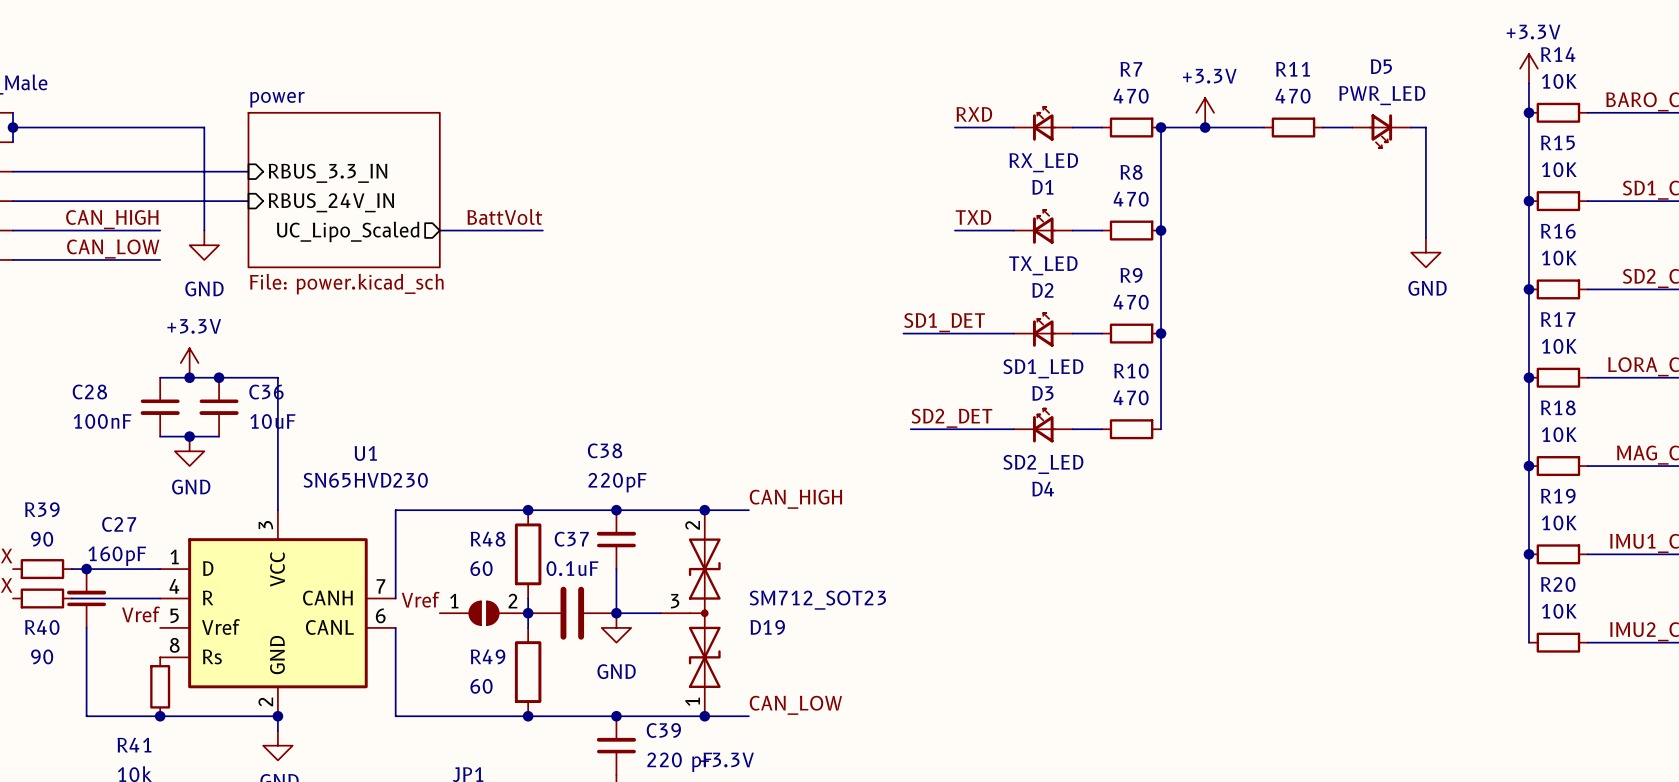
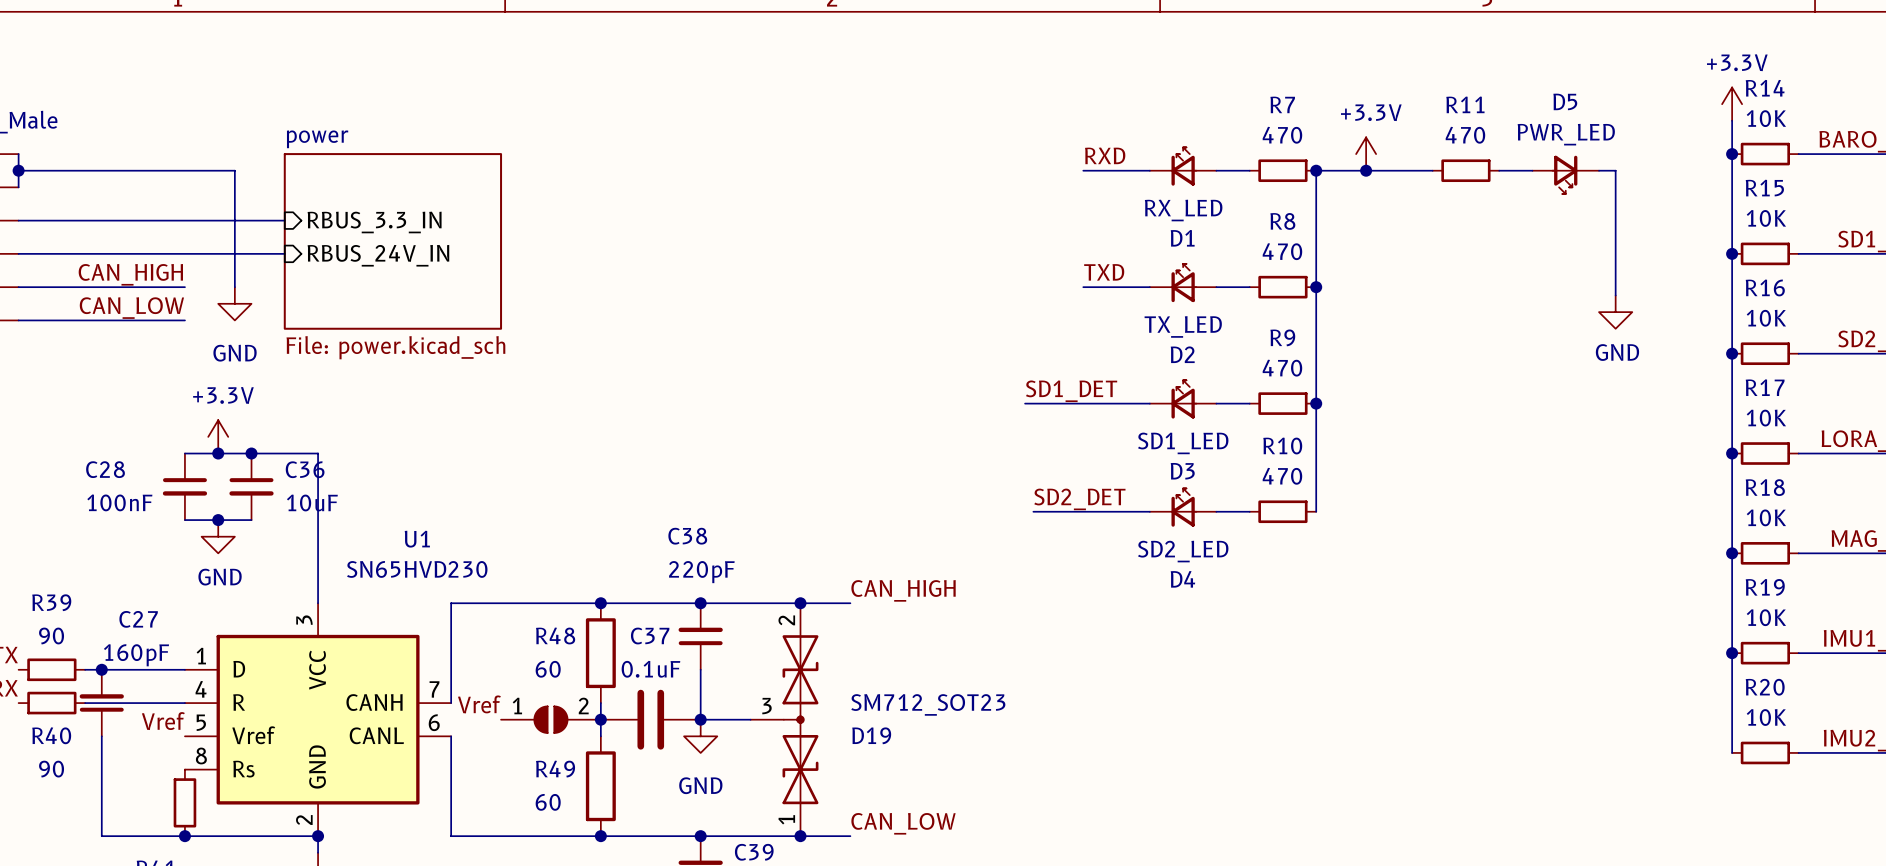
label: BattVolt (504, 217) -> none
wire: (439, 230) (542, 230) -> none
sheet pin: UC_Lipo_Scaled (348, 231) -> none

